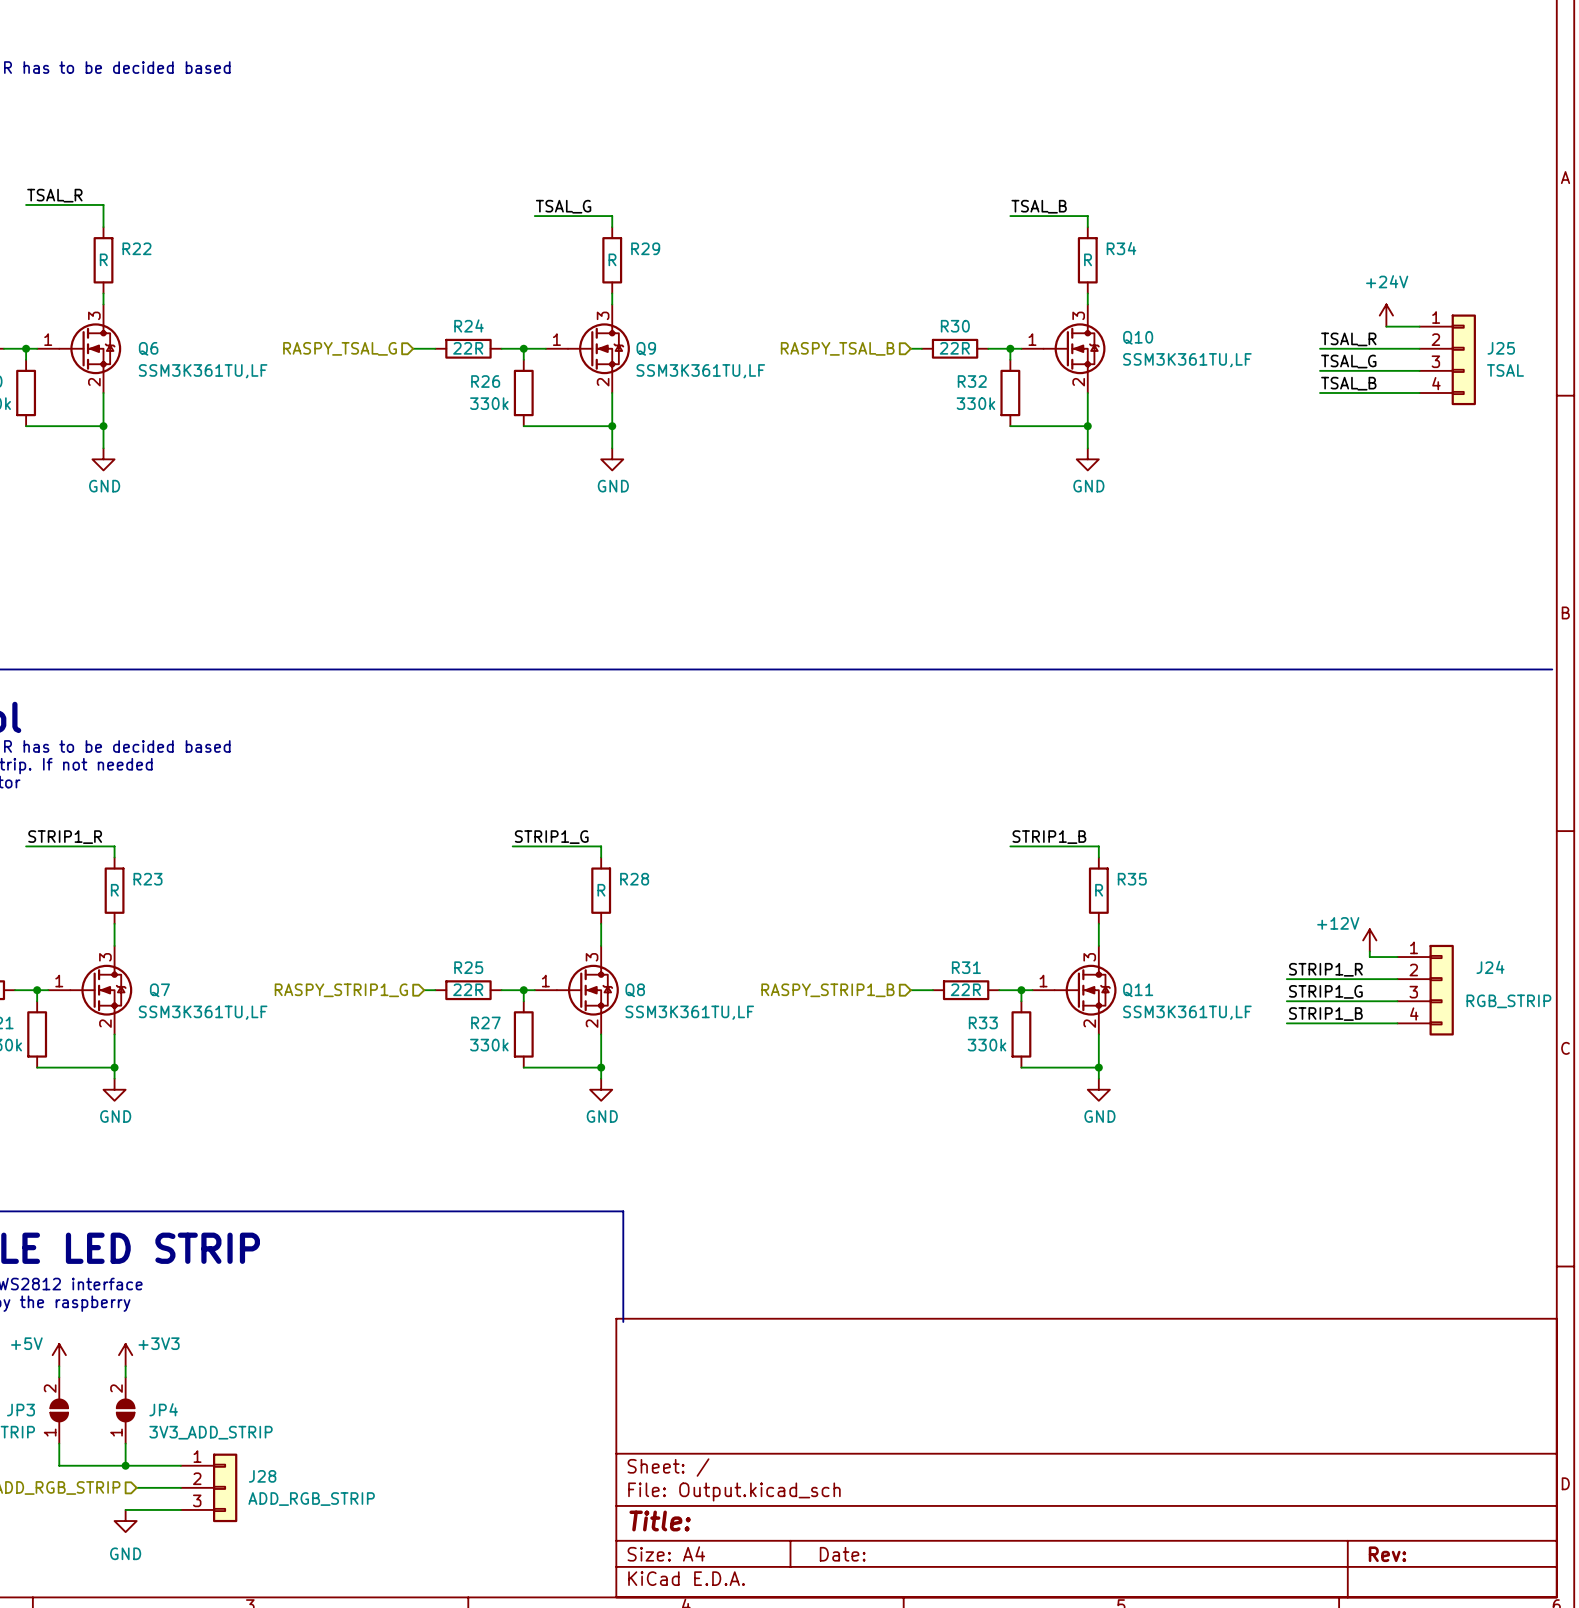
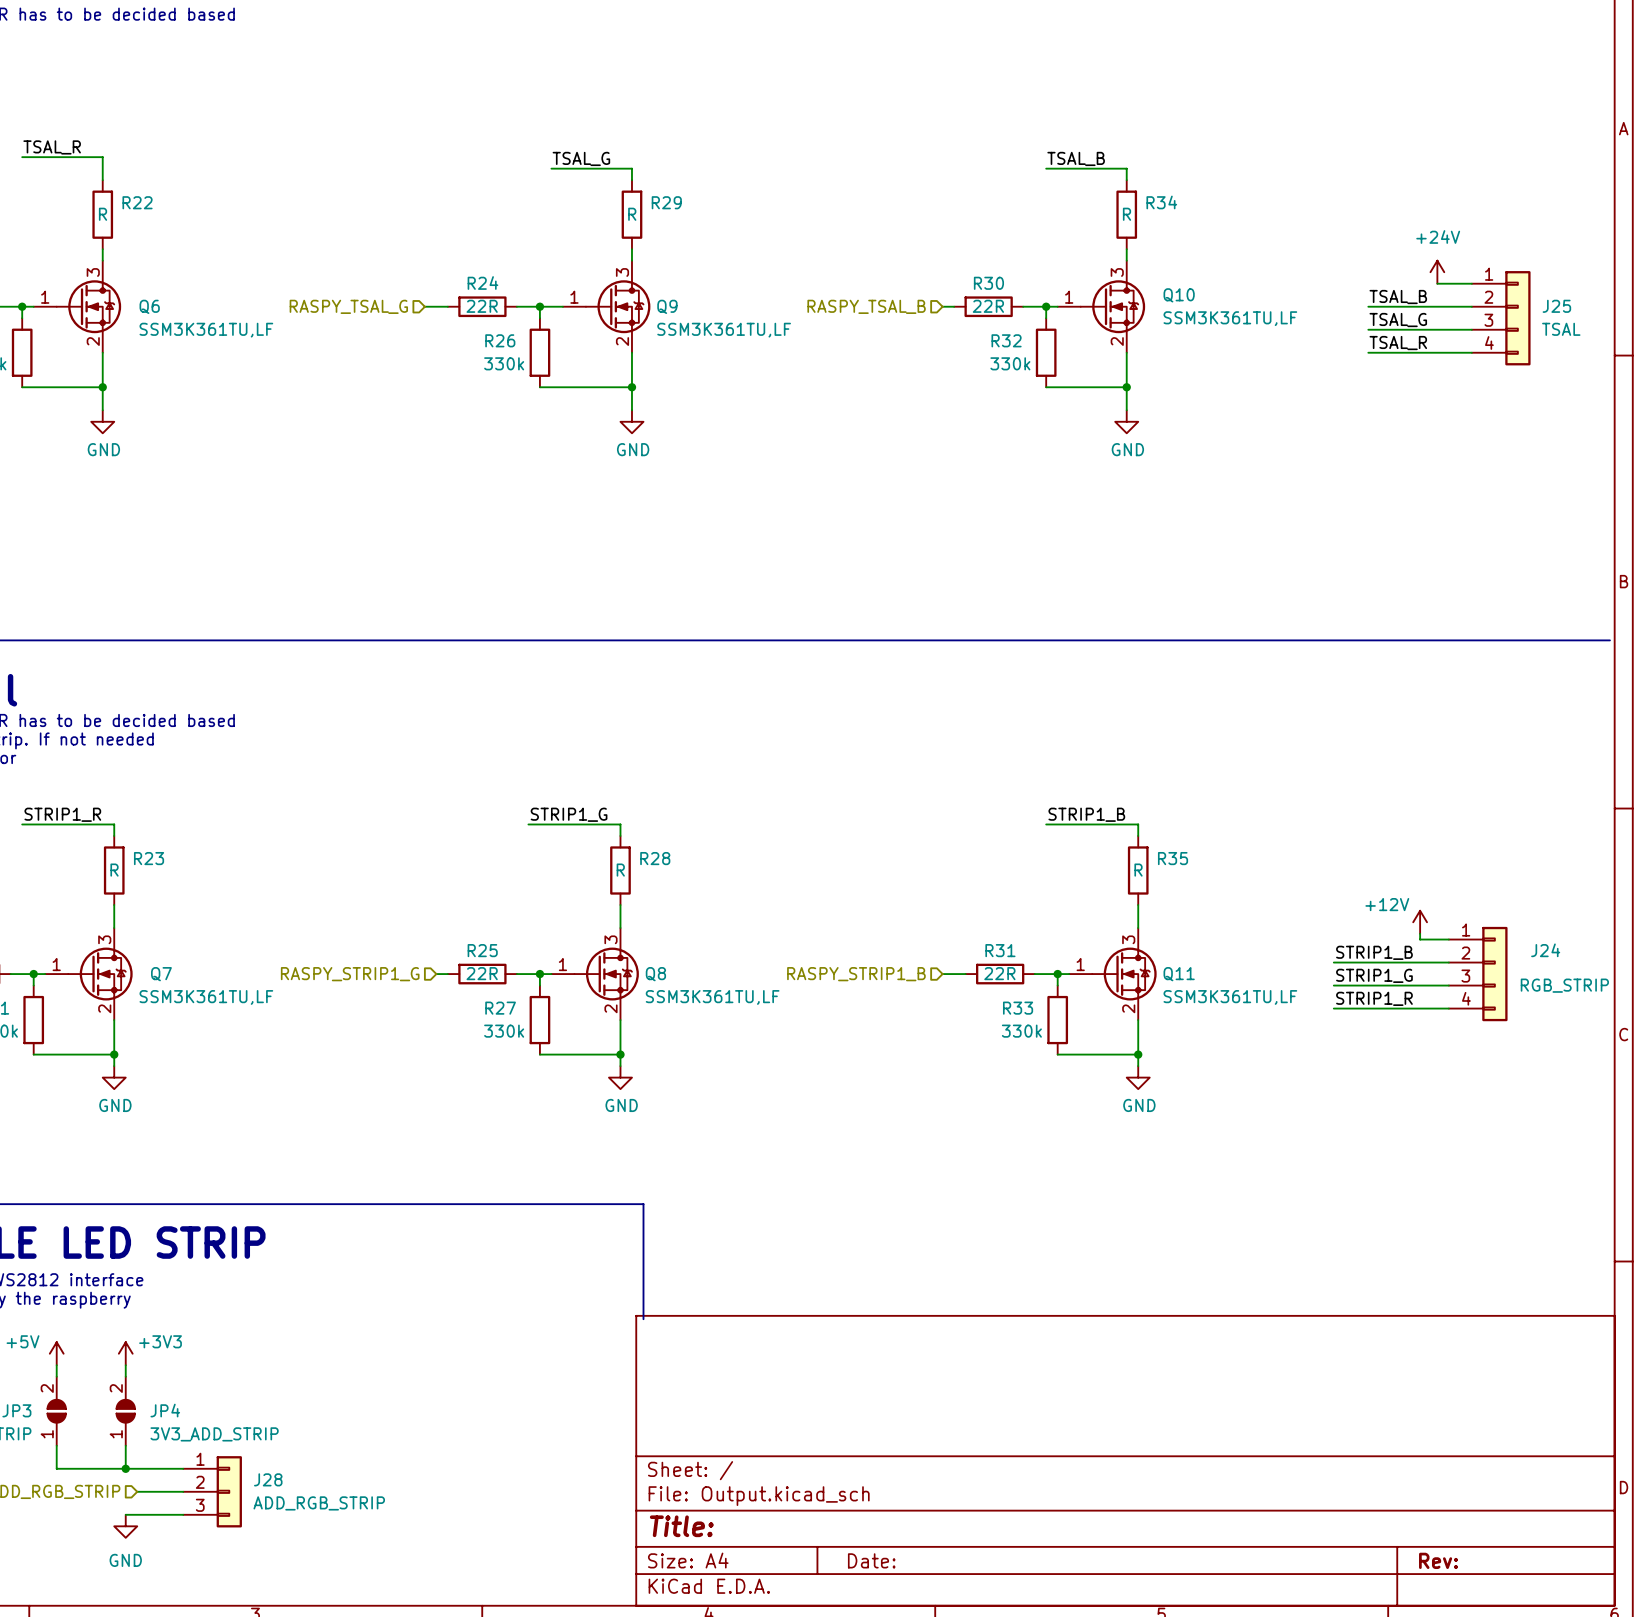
label: TSAL_R (1348, 339) -> TSAL_B (1398, 297)
label: TSAL_B (1348, 383) -> TSAL_R (1398, 343)
label: STRIP1_R (1325, 969) -> STRIP1_B (1374, 952)
label: STRIP1_B (1325, 1014) -> STRIP1_R (1374, 998)

